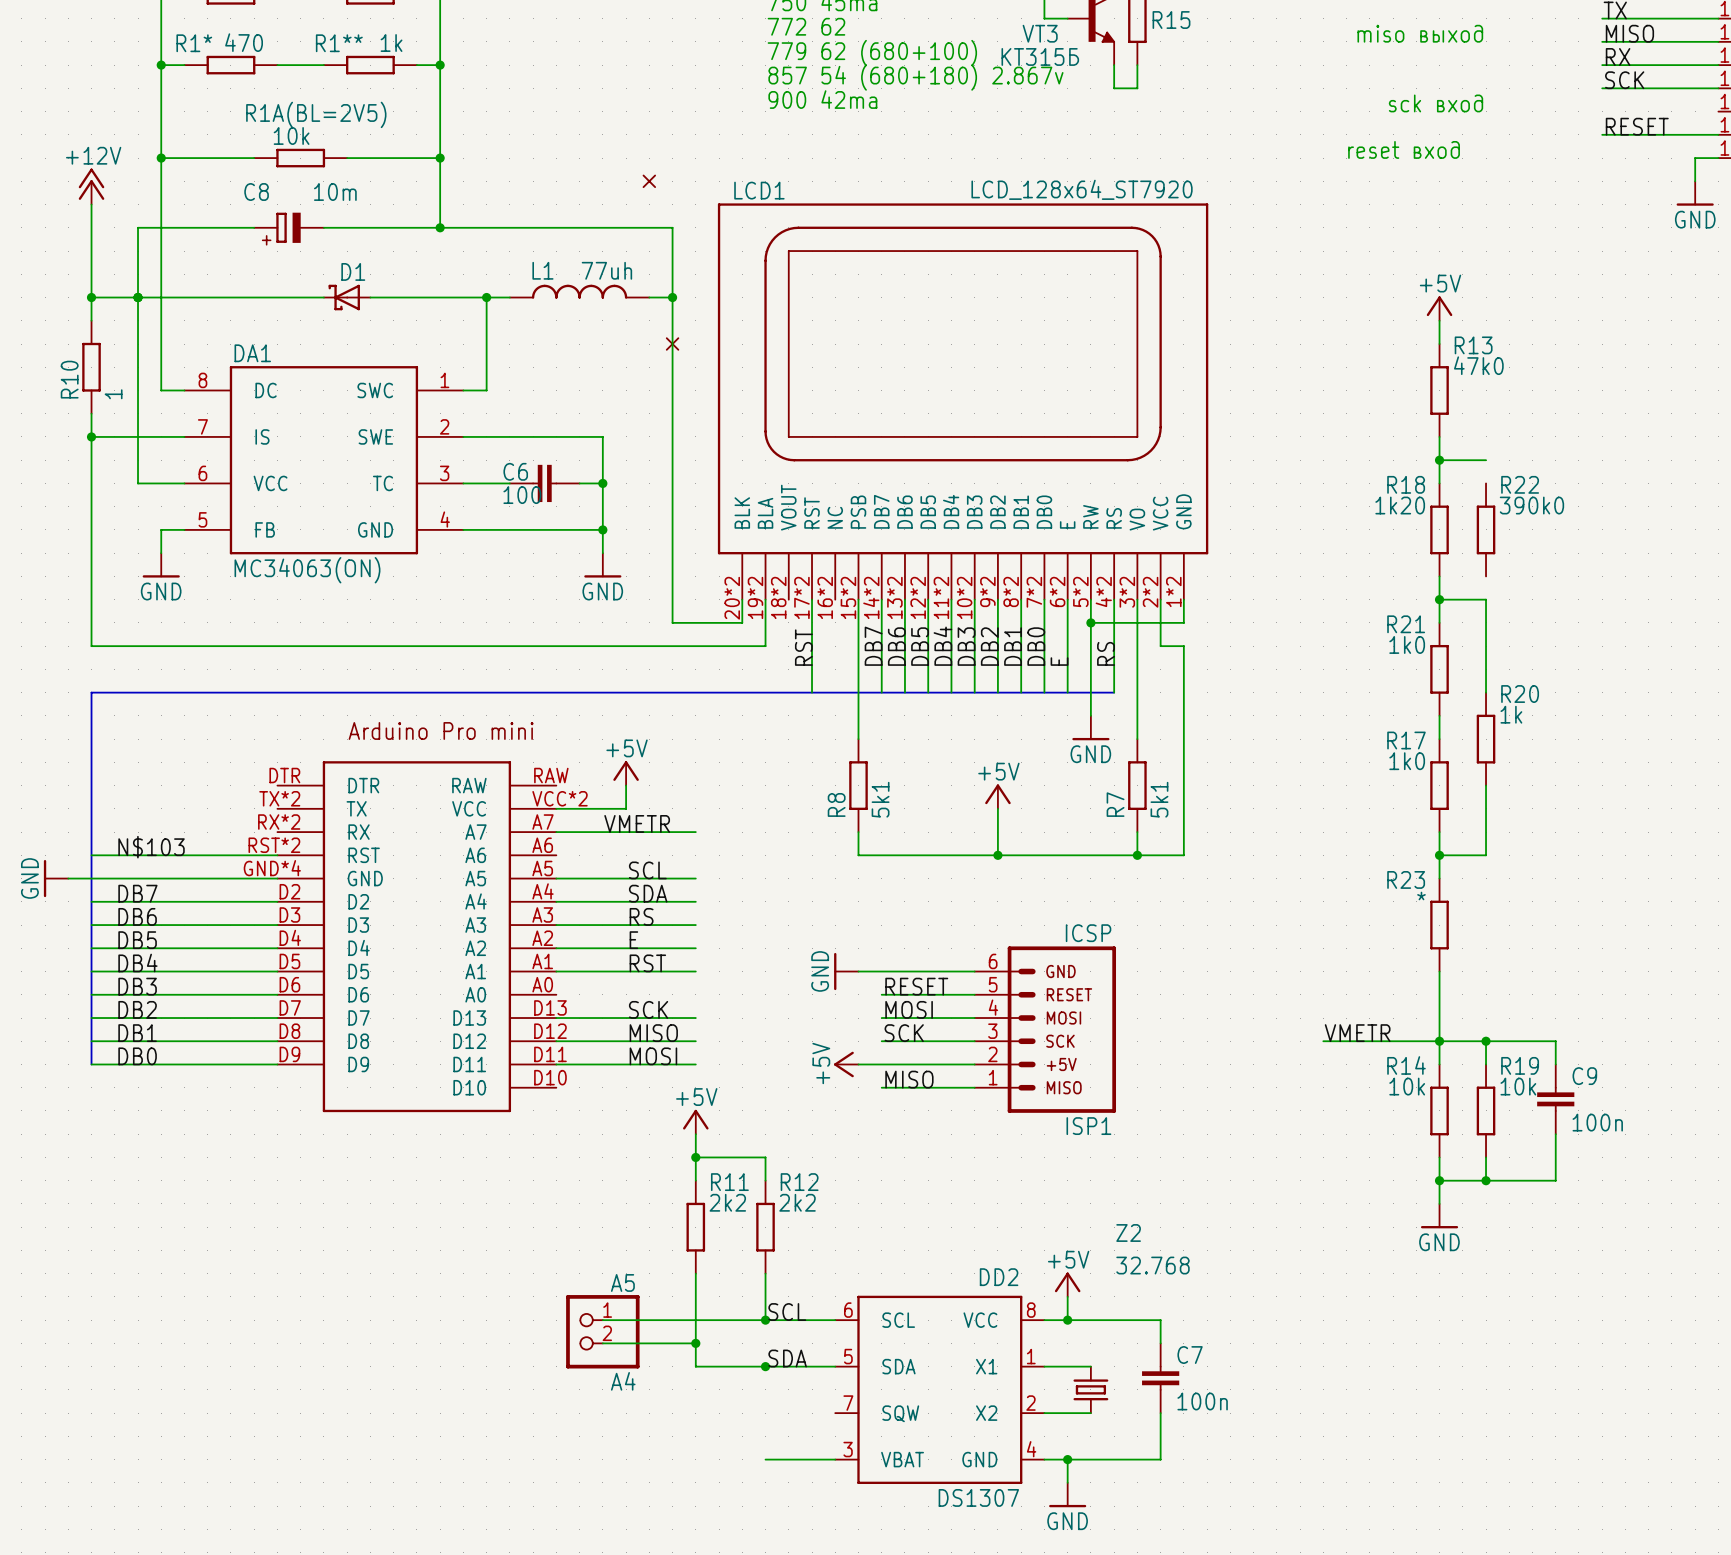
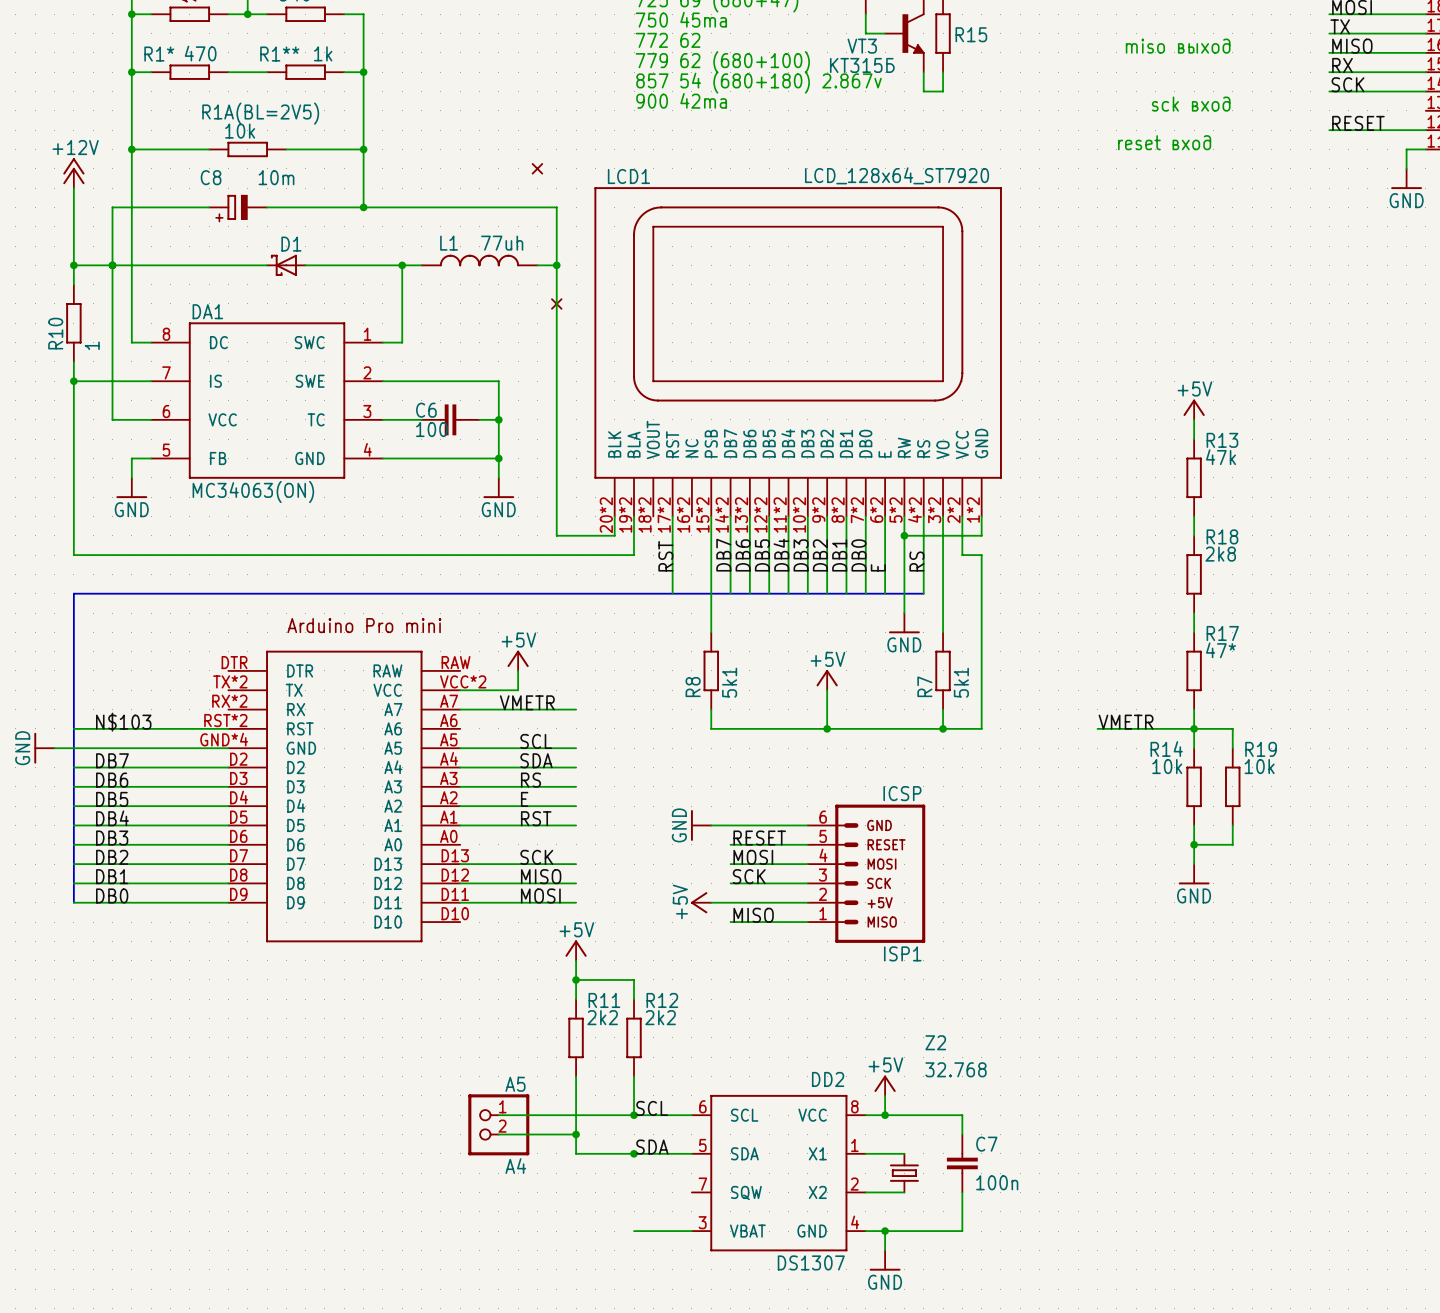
power symbol position: +5V (1439, 308) -> +5V (1194, 409)
wire: (1439, 320) (1439, 344) -> none
R13 value: 47k0 (1478, 365) -> 47k (1221, 457)
R13 position: (1439, 390) -> (1194, 477)
wire: (1439, 460) (1486, 460) -> none
junction: (1439, 460) -> none
R18: 1k20 (1439, 529) -> none
R22: 390k0 (1486, 529) -> none
wire: (1439, 576) (1439, 599) (1486, 599) (1486, 692) -> none
junction: (1439, 599) -> none
R21 name: R21 (1406, 624) -> R18 (1222, 536)
R21 value: 1k0 (1407, 644) -> 2k8 (1220, 554)
R20: 1k (1486, 739) -> none
R17 name position: R17 (1406, 740) -> R17 (1222, 633)
R17 value: 1k0 (1407, 761) -> 47* (1221, 650)
wire: (1486, 785) (1486, 855) -> (1232, 748) (1232, 728)
wire: none -> (1097, 728) (1194, 728)
R23 name: R23 (1406, 879) -> R14 (1166, 749)
R23 value: * (1421, 895) -> 10k (1167, 766)
wire: none -> (1232, 825) (1232, 844) (1194, 844)
junction: none -> (1194, 844)
label position: VMETR (1357, 1033) -> VMETR (1126, 722)
wire: (1323, 1041) (1555, 1041) (1555, 1064) -> none
junction: (1439, 1041) -> none
wire: (1486, 1041) (1486, 1064) -> none
junction: (1486, 1041) -> none
C9: 100n (1555, 1099) -> none
R14: 10k (1439, 1110) -> none
R19 position: (1486, 1110) -> (1232, 786)
wire: (1555, 1134) (1555, 1180) (1439, 1180) -> none
wire: (1439, 1157) (1439, 1203) -> none
wire: (1486, 1157) (1486, 1180) -> none
junction: (1439, 1180) -> none
junction: (1486, 1180) -> none
power symbol position: GND (1439, 1216) -> GND (1194, 874)

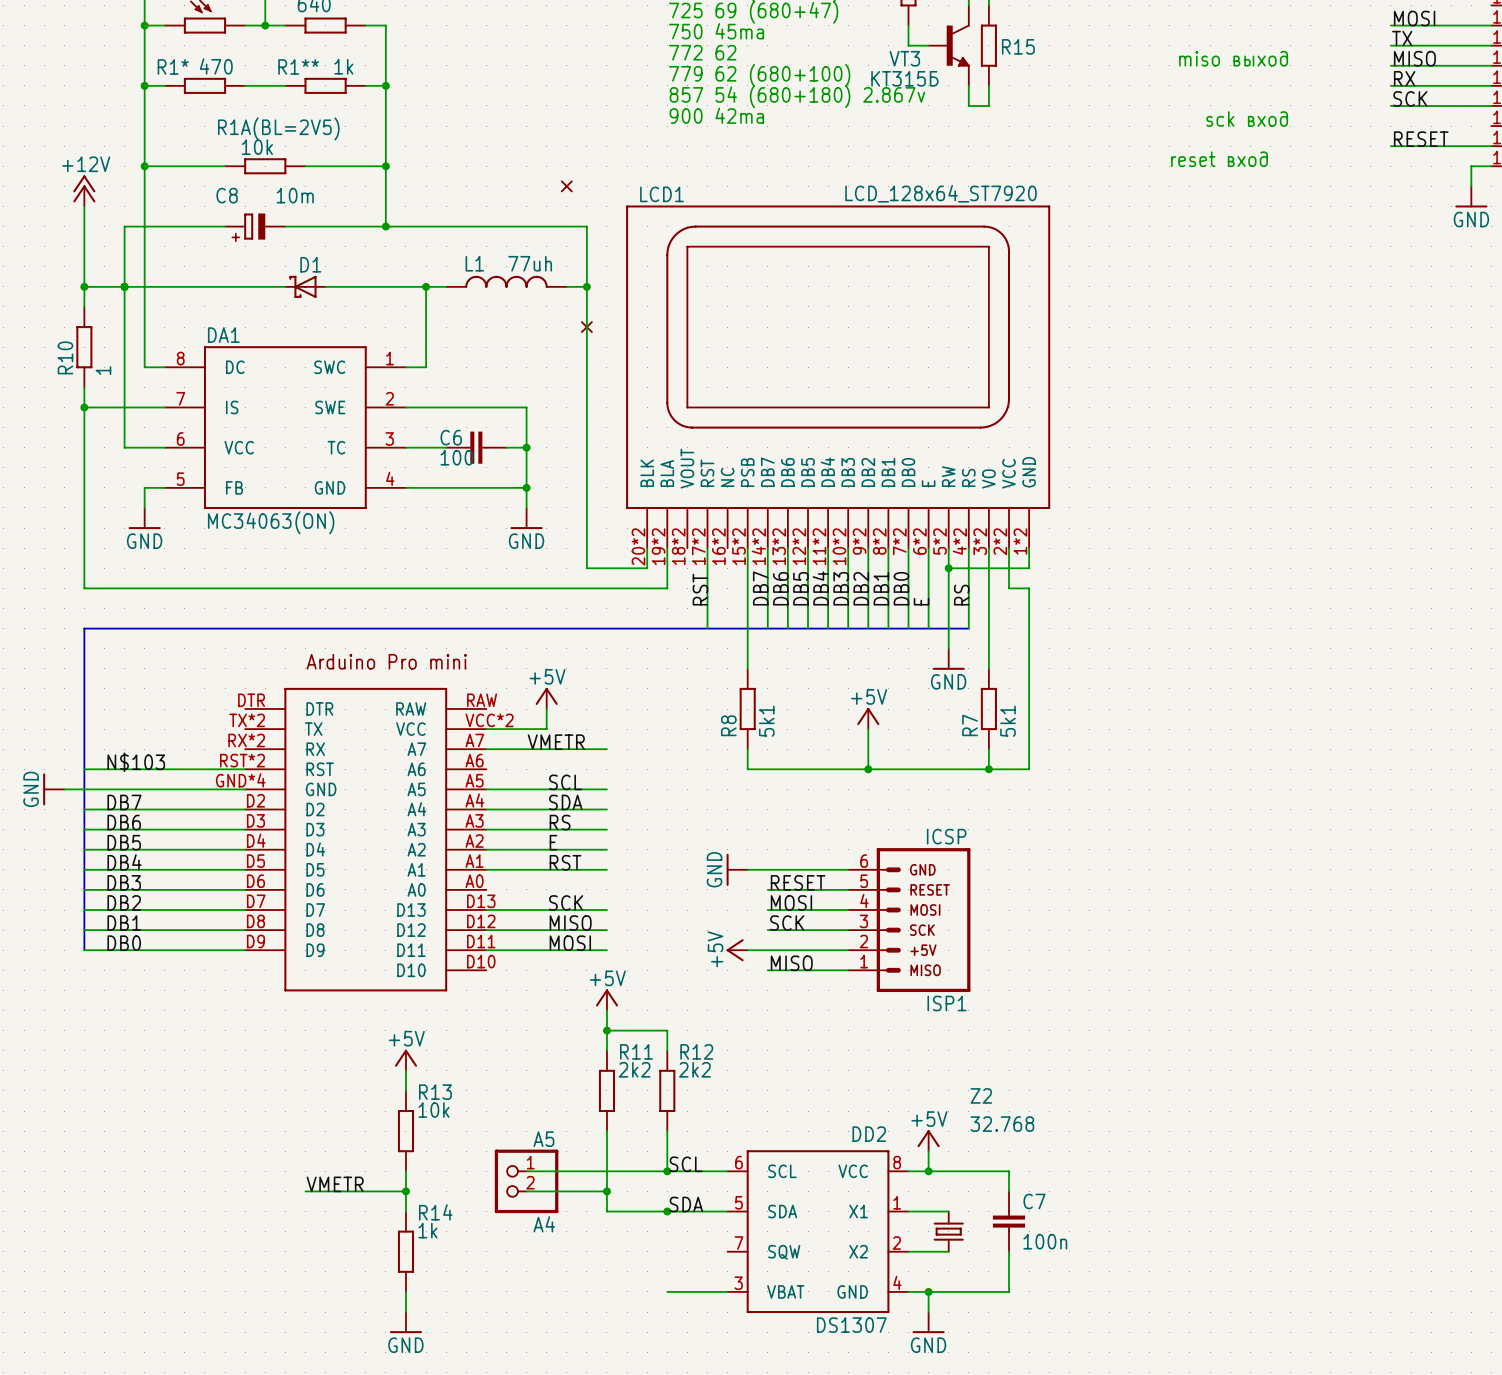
power symbol: +5V (1194, 409) -> none
wire: (1194, 419) (1194, 439) -> none
R13 value: 47k (1221, 457) -> 10k (433, 1110)
R13 position: (1194, 477) -> (405, 1131)
wire: (1194, 516) (1194, 535) -> none
R18: 2k8 (1194, 574) -> none
wire: (1194, 613) (1194, 632) -> none
R17: 47* (1194, 670) -> none
wire: (1194, 709) (1194, 748) -> none
label: VMETR (1126, 722) -> none
wire: (1097, 728) (1232, 728) (1232, 748) -> none
junction: (1194, 728) -> none
R14 name position: R14 (1166, 749) -> R14 (435, 1212)
R14 value: 10k (1167, 766) -> 1k (427, 1230)
R14 position: (1194, 786) -> (405, 1251)
R19: 10k (1232, 786) -> none
wire: (1194, 825) (1194, 864) -> none
wire: (1232, 825) (1232, 844) (1194, 844) -> none
junction: (1194, 844) -> none
power symbol: GND (1194, 874) -> none
power symbol: none -> +5V (405, 1060)
wire: none -> (405, 1070) (405, 1090)
wire: none -> (405, 1171) (405, 1211)
label: none -> VMETR (335, 1184)
wire: none -> (305, 1191) (405, 1191)
junction: none -> (405, 1191)
wire: none -> (405, 1291) (405, 1312)
power symbol: none -> GND (405, 1322)

